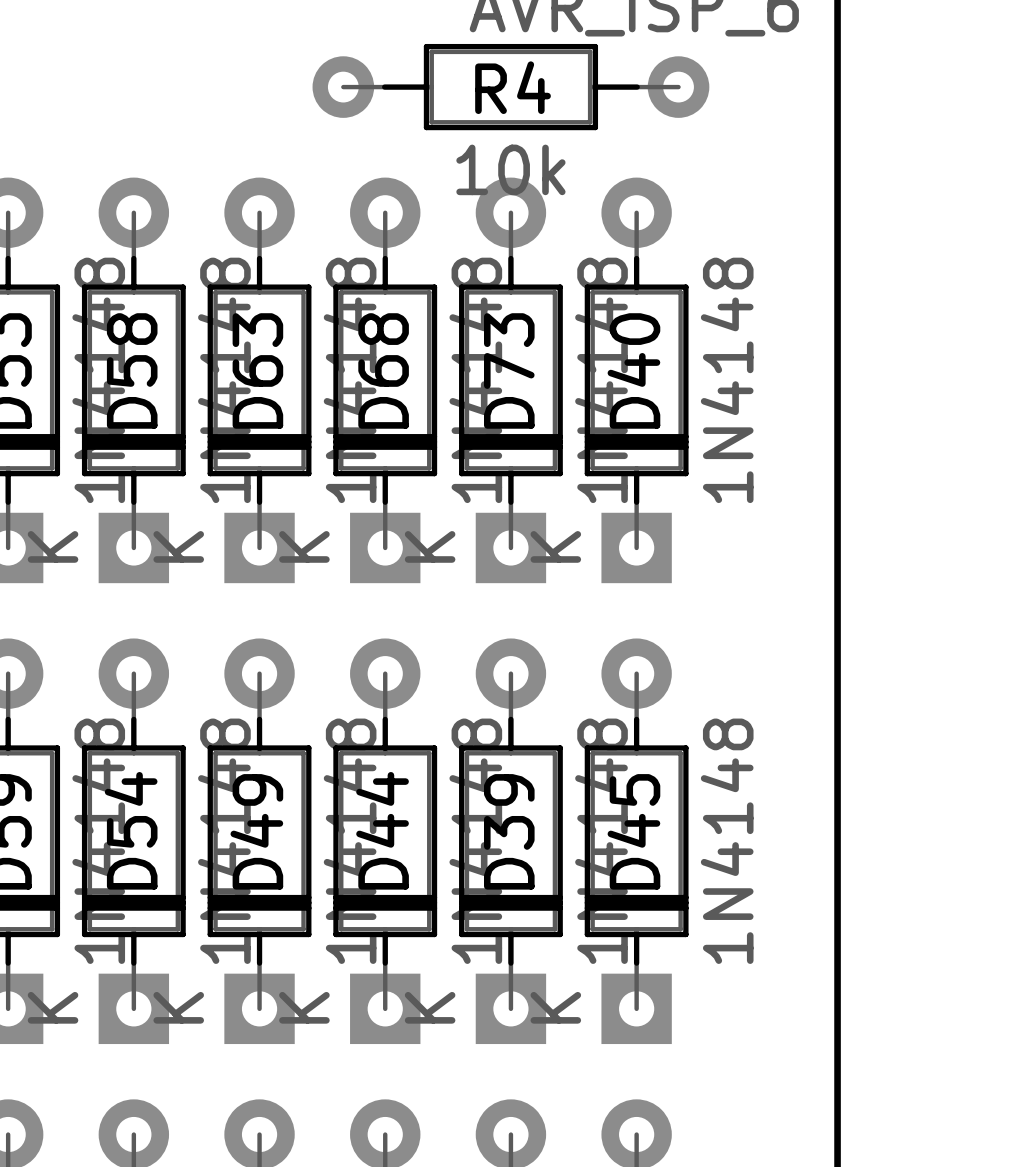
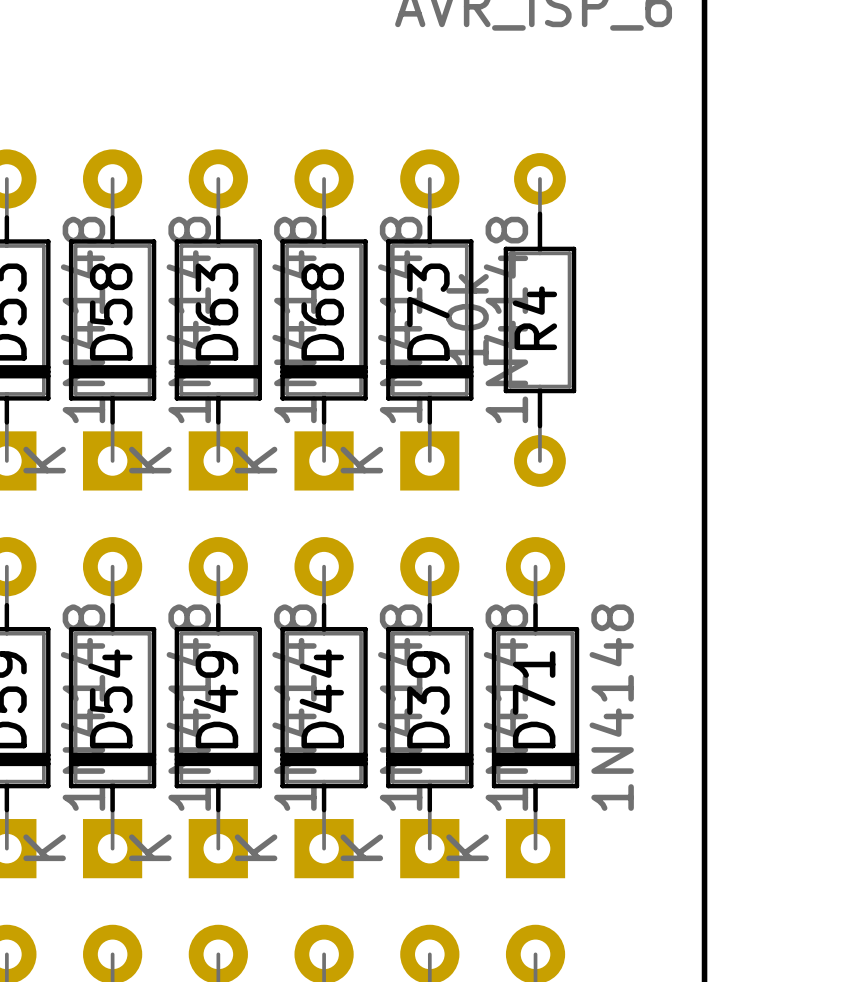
R4 rotation: 0° (510, 87) -> 90° clockwise (539, 319)
R4 position: (510, 87) -> (539, 319)
D40: 1N4148 (636, 380) -> none
D45 name: D45 (633, 831) -> D71 (534, 699)

